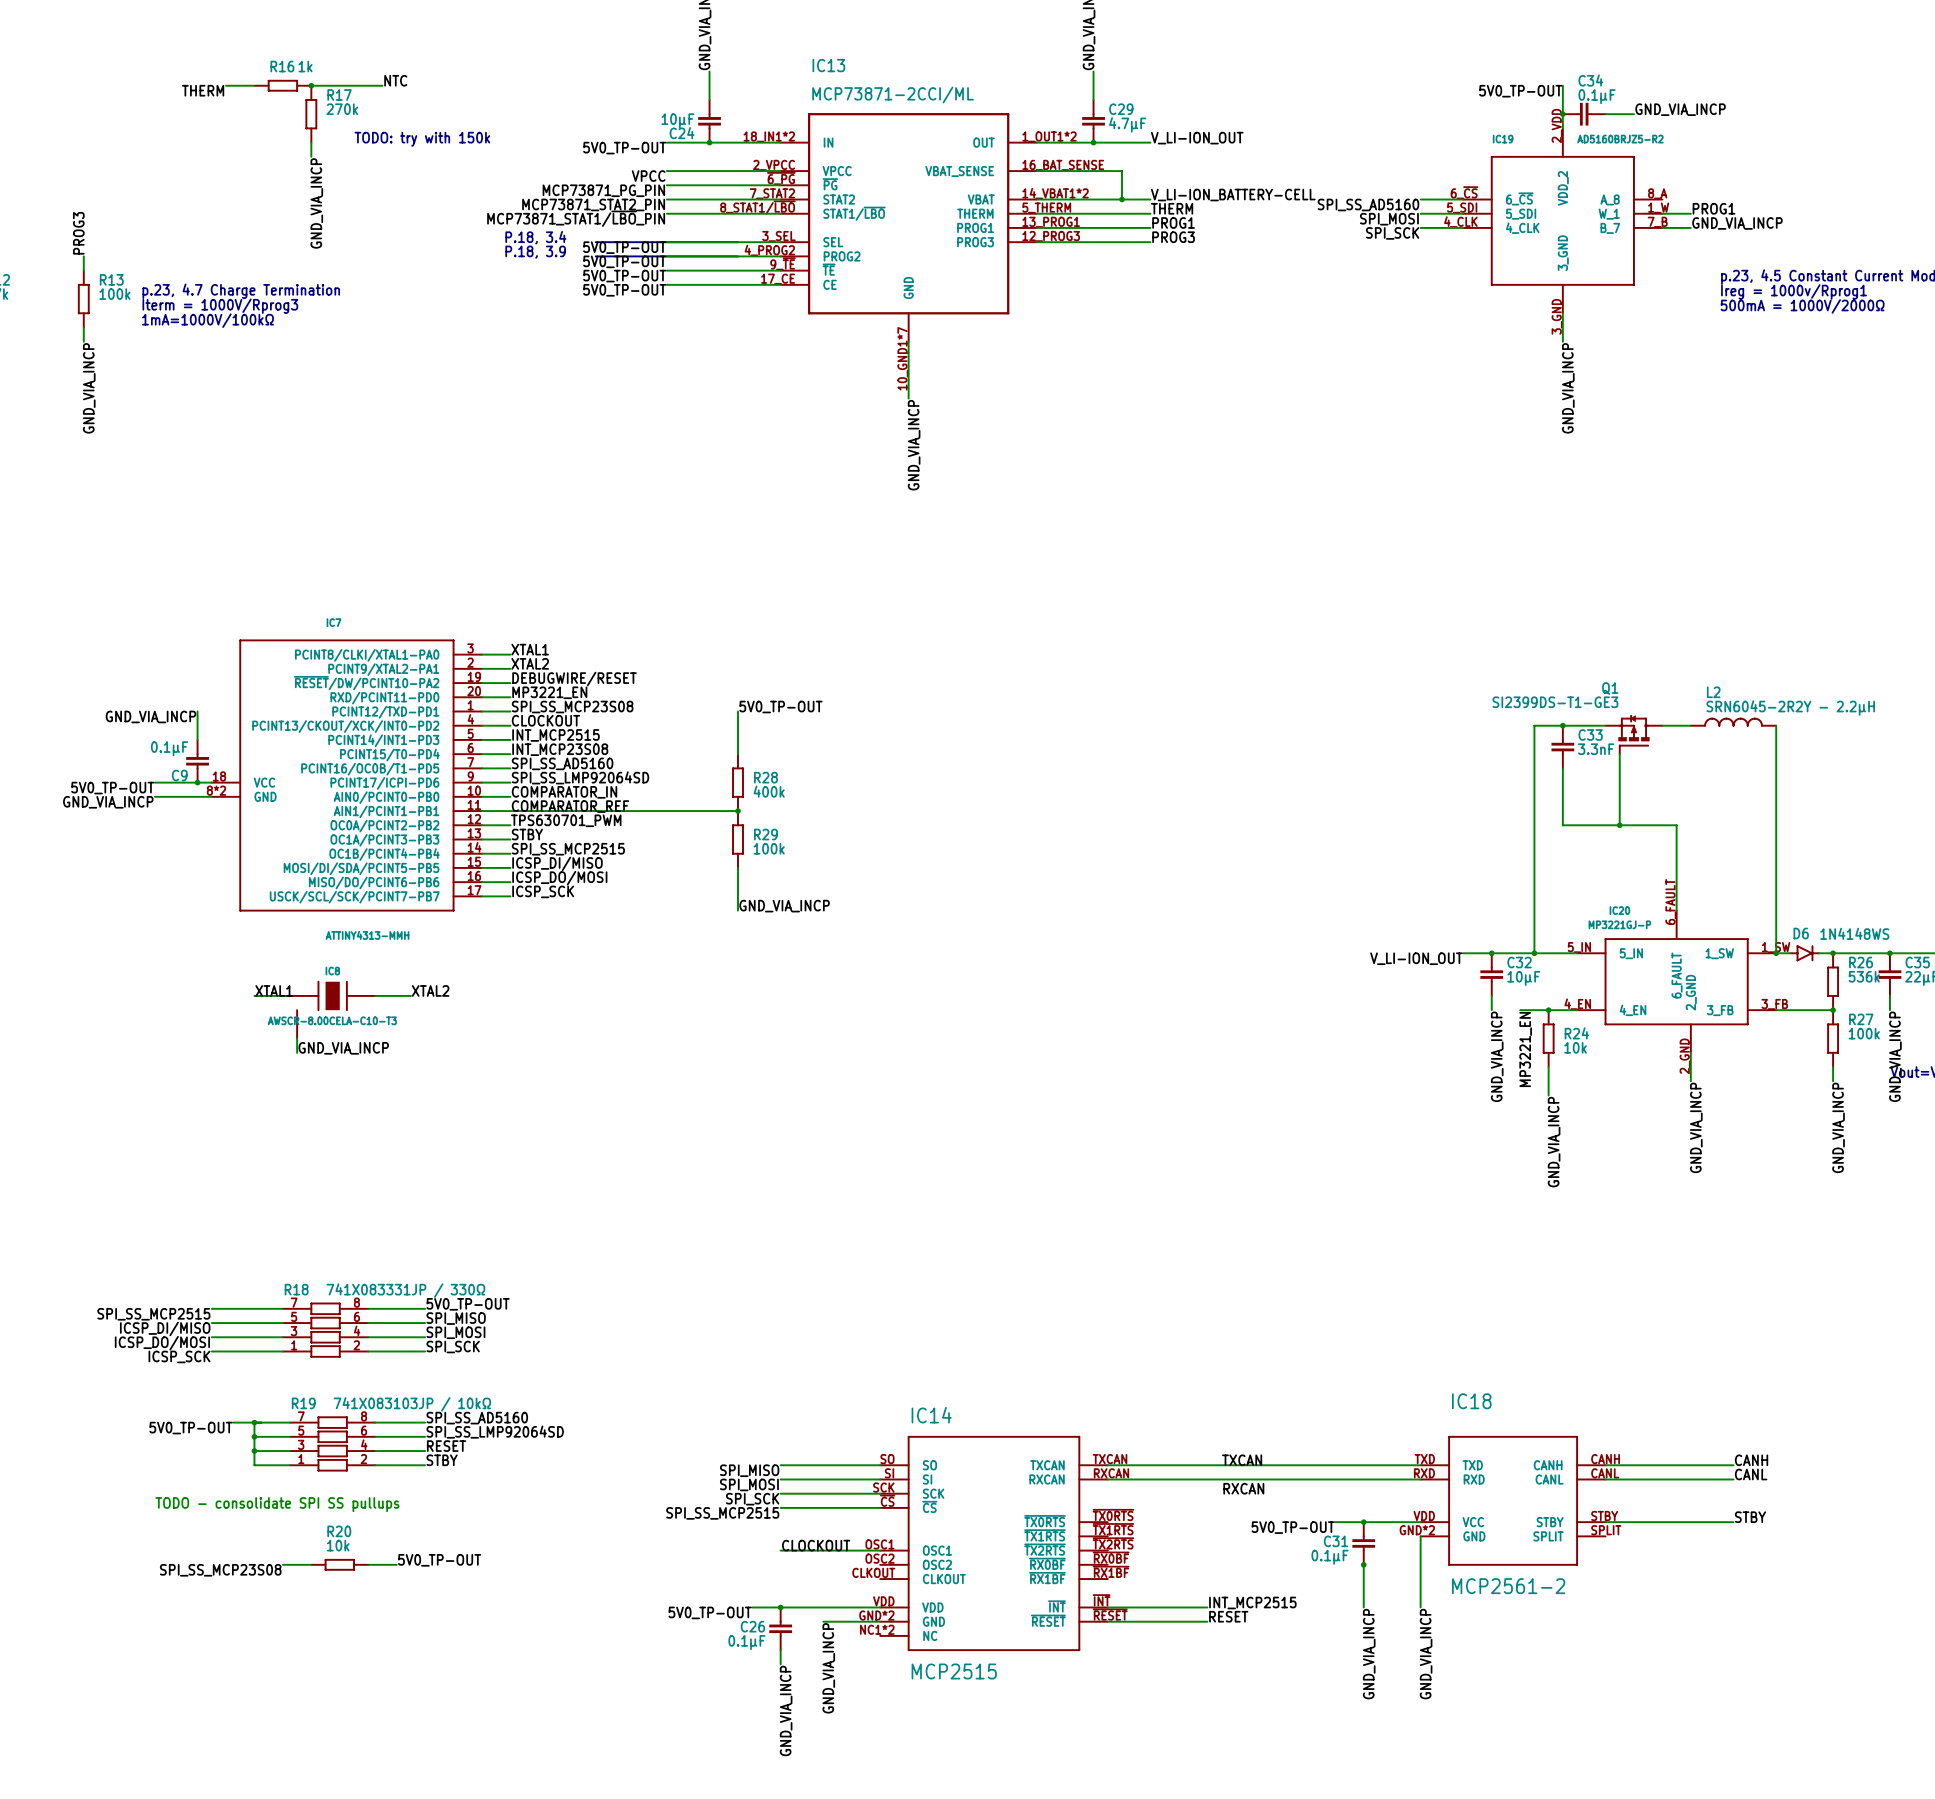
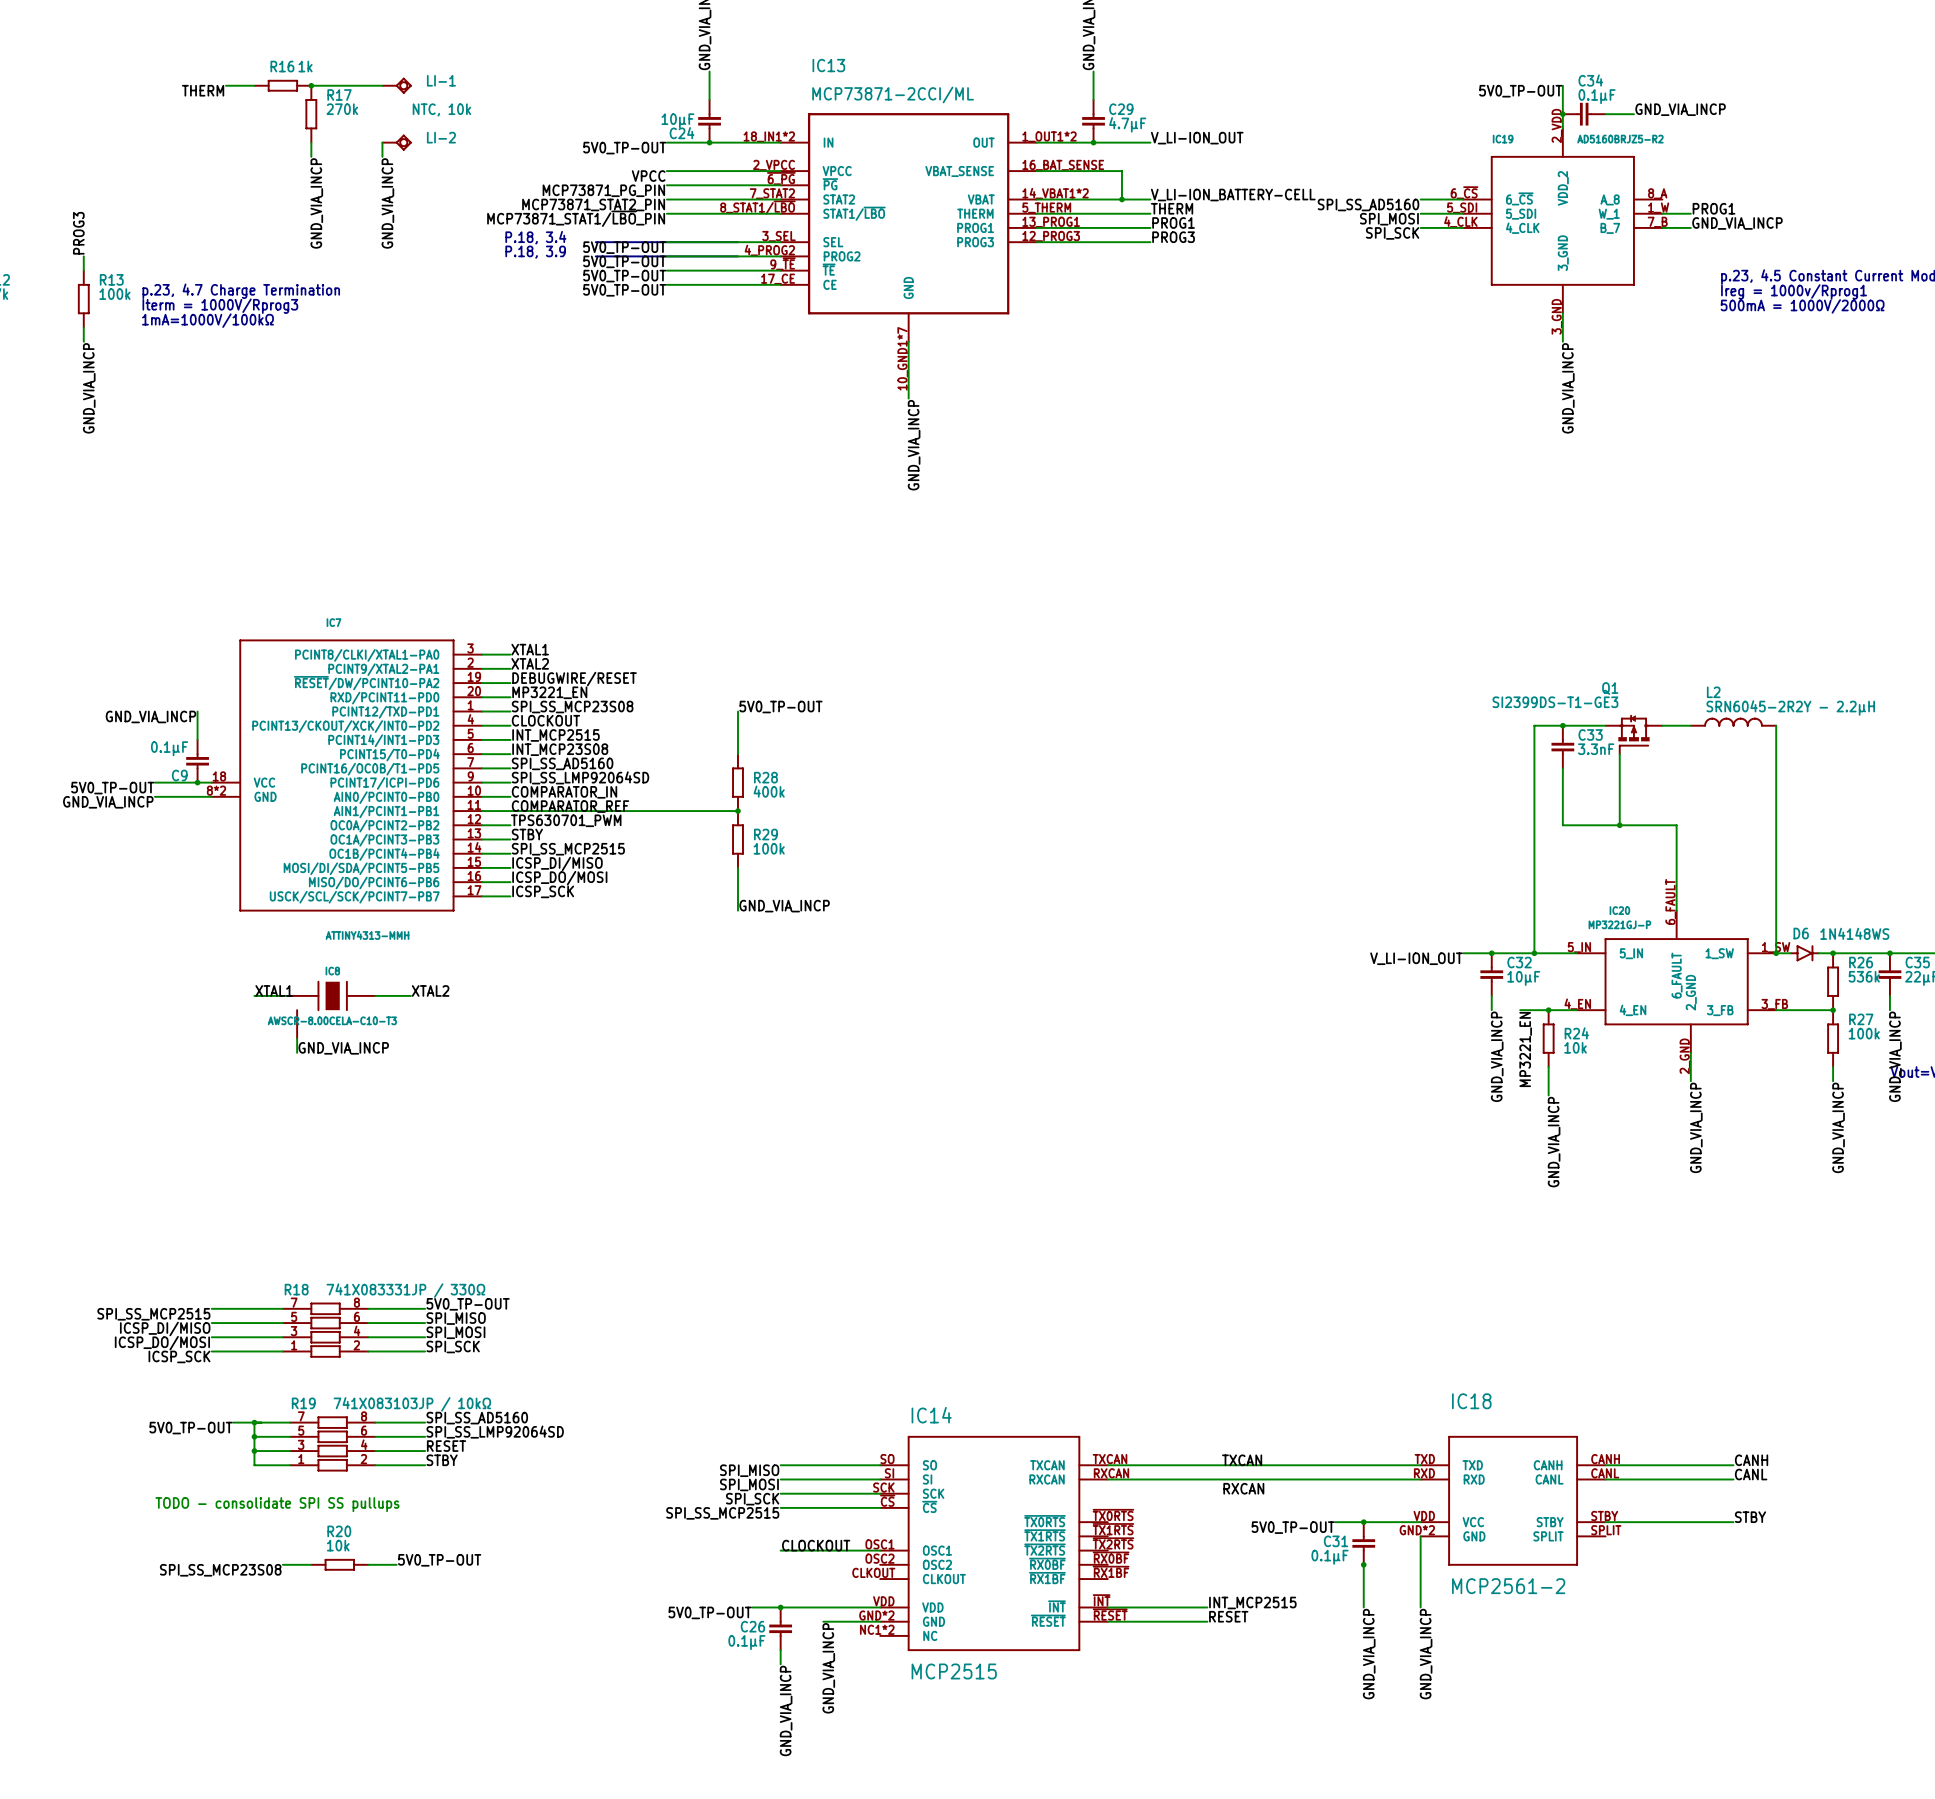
label: NTC (395, 80) -> none
LI-1: none -> (396, 85)
text: none -> NTC, 10k (441, 109)
text: TODO: try with 150k (422, 139) -> none
wire: none -> (382, 142) (382, 156)
LI-2: none -> (396, 142)
label: none -> GND_VIA_INCP (387, 203)

